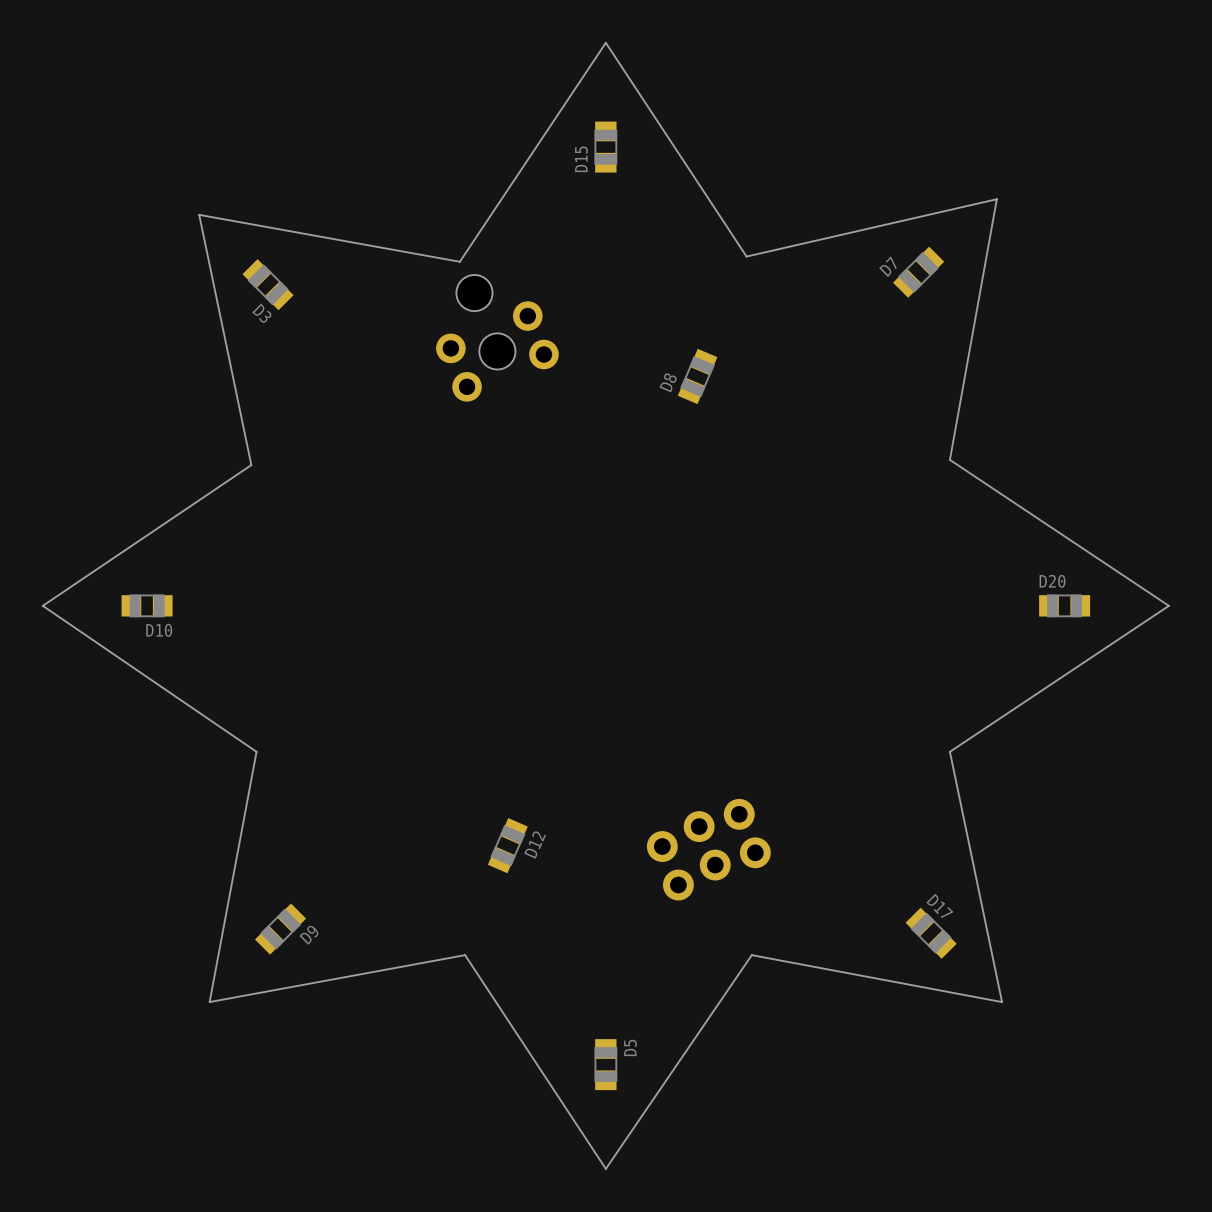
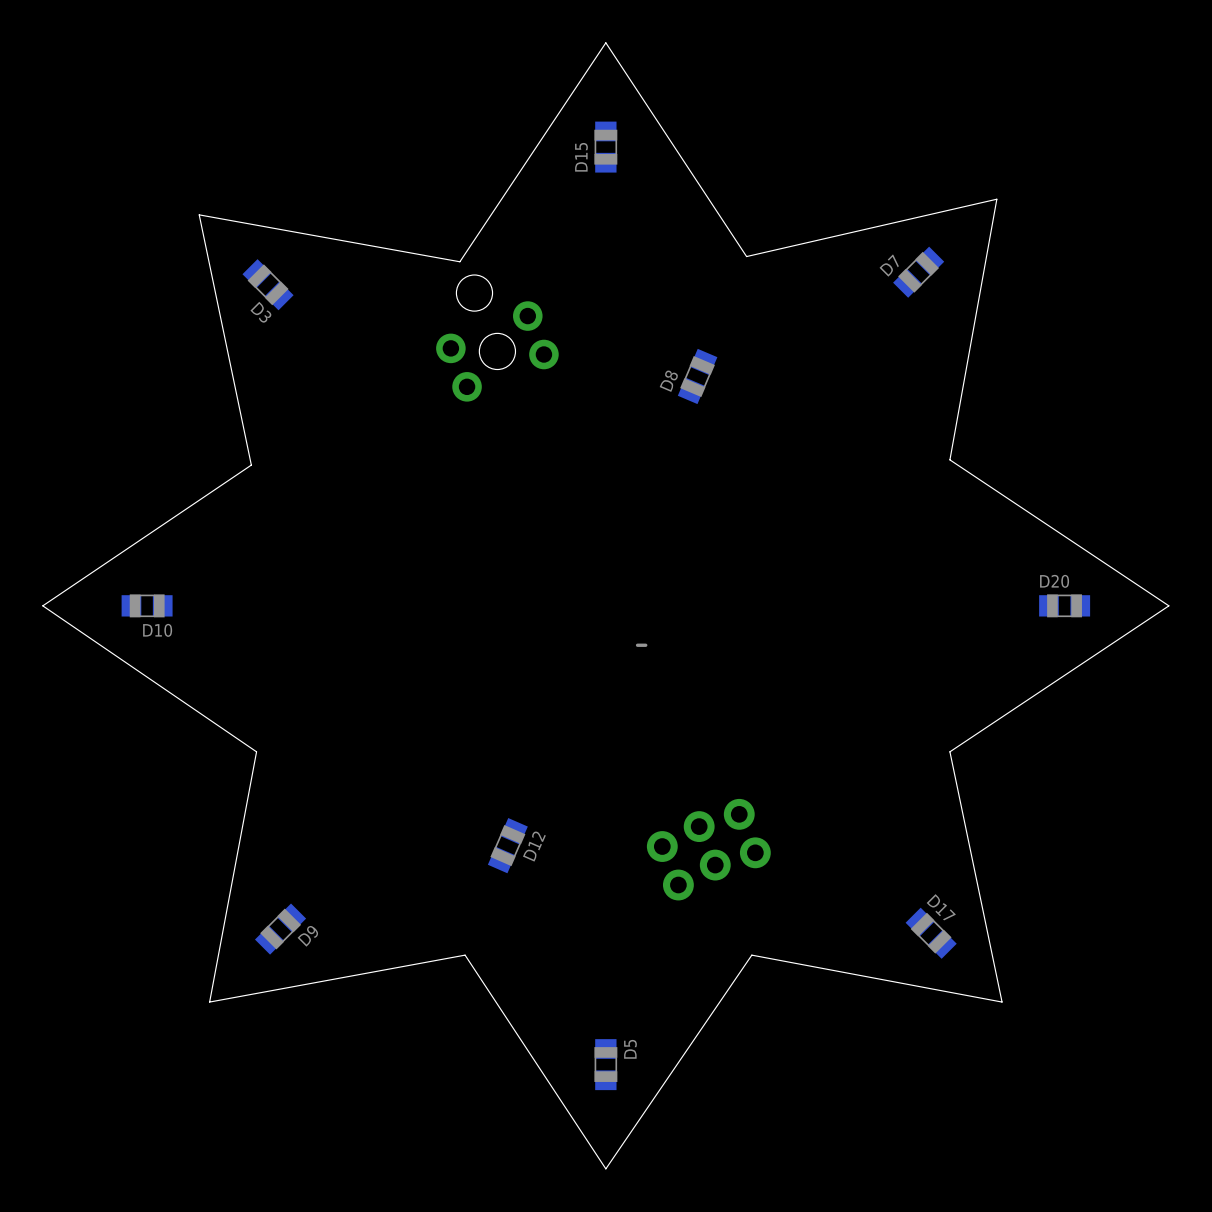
part: none -> (641, 645)

